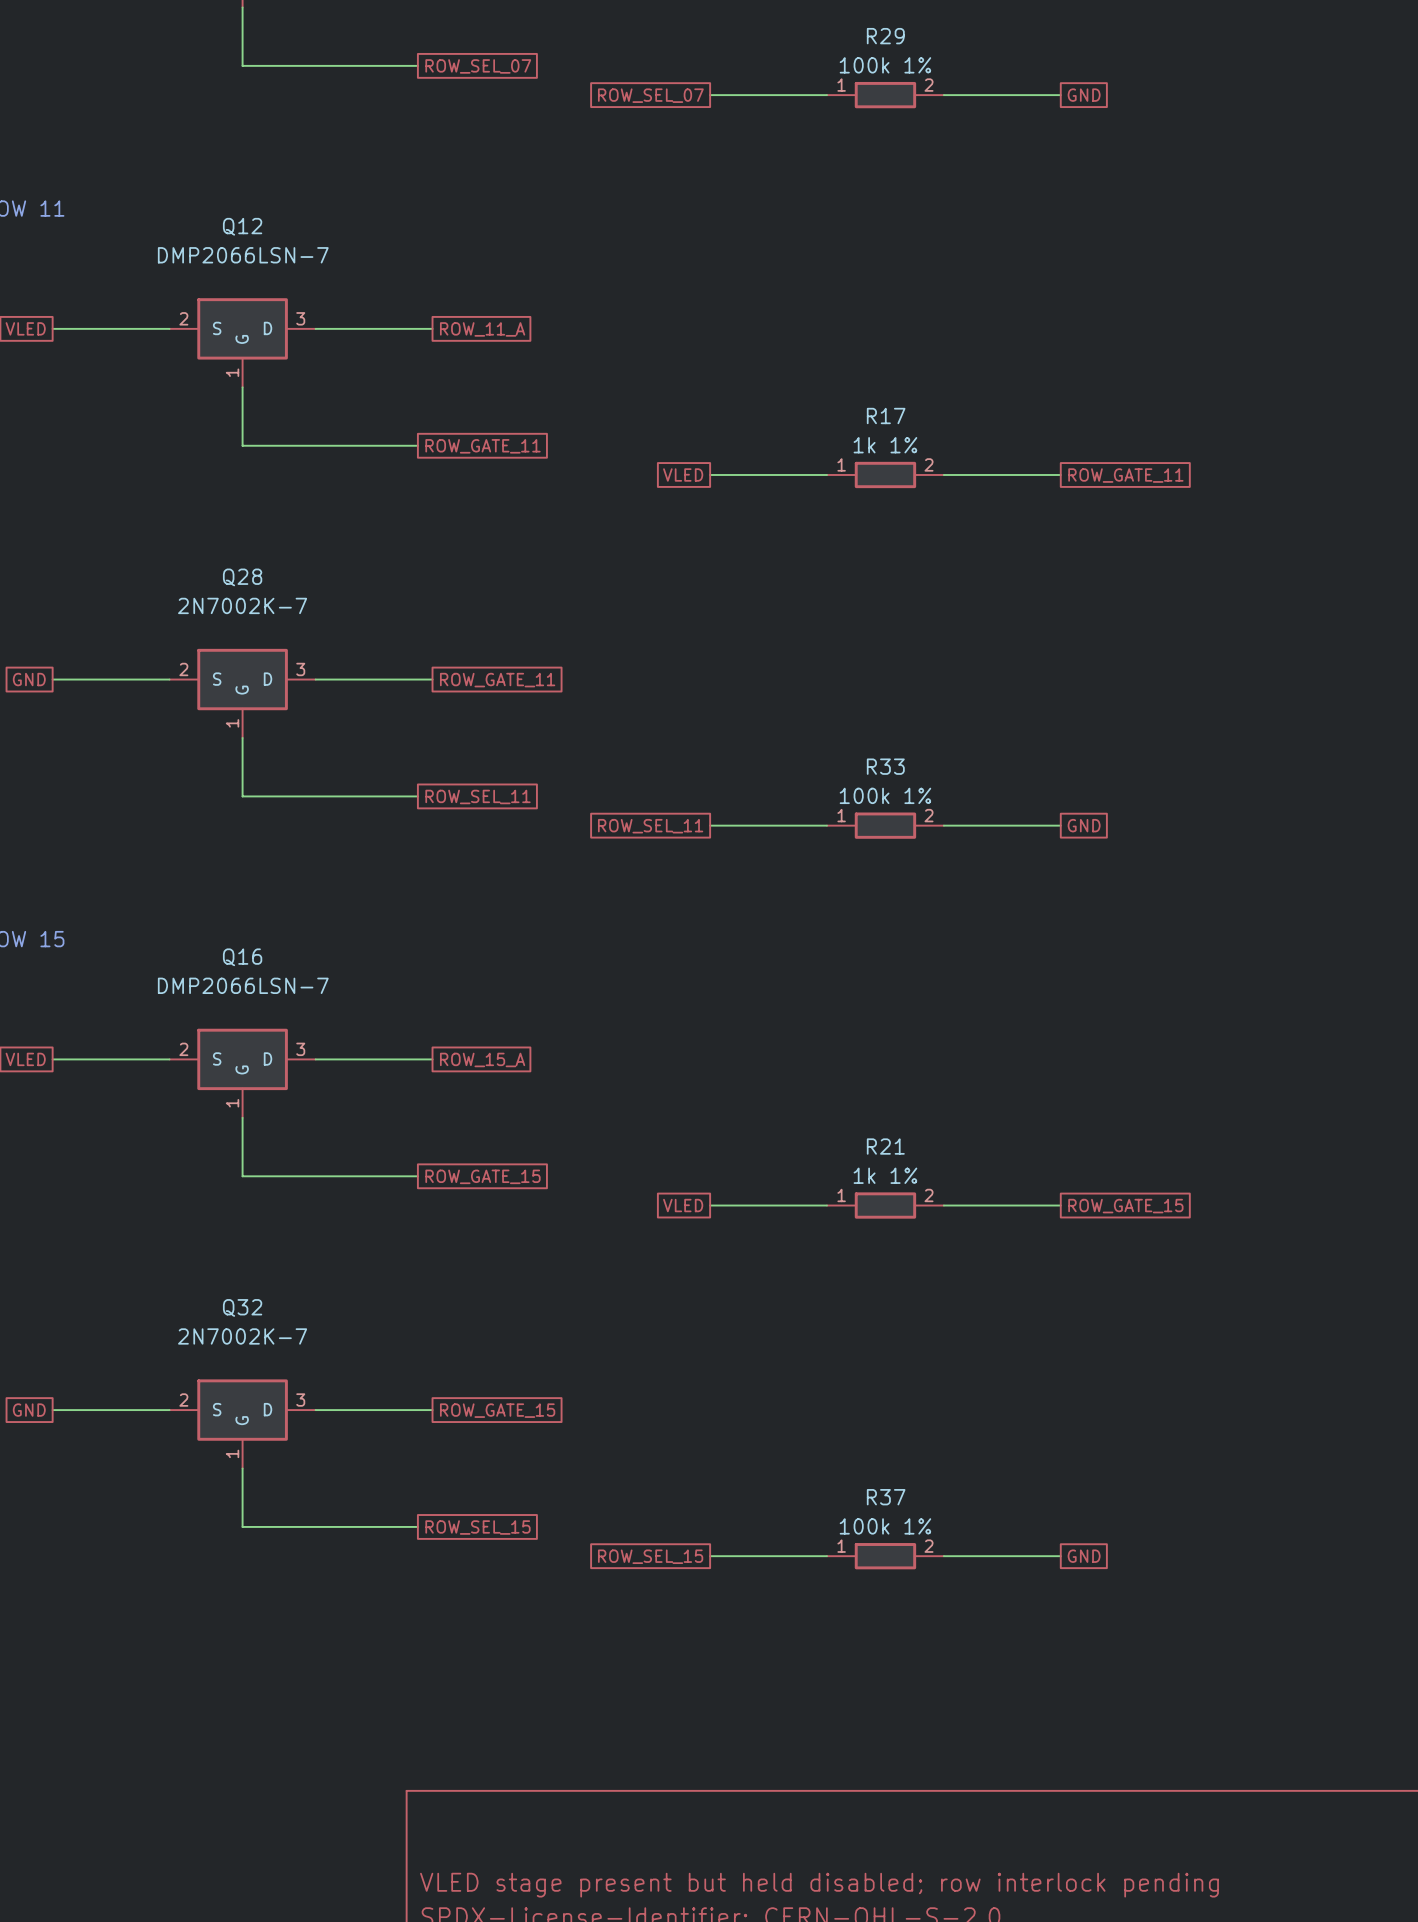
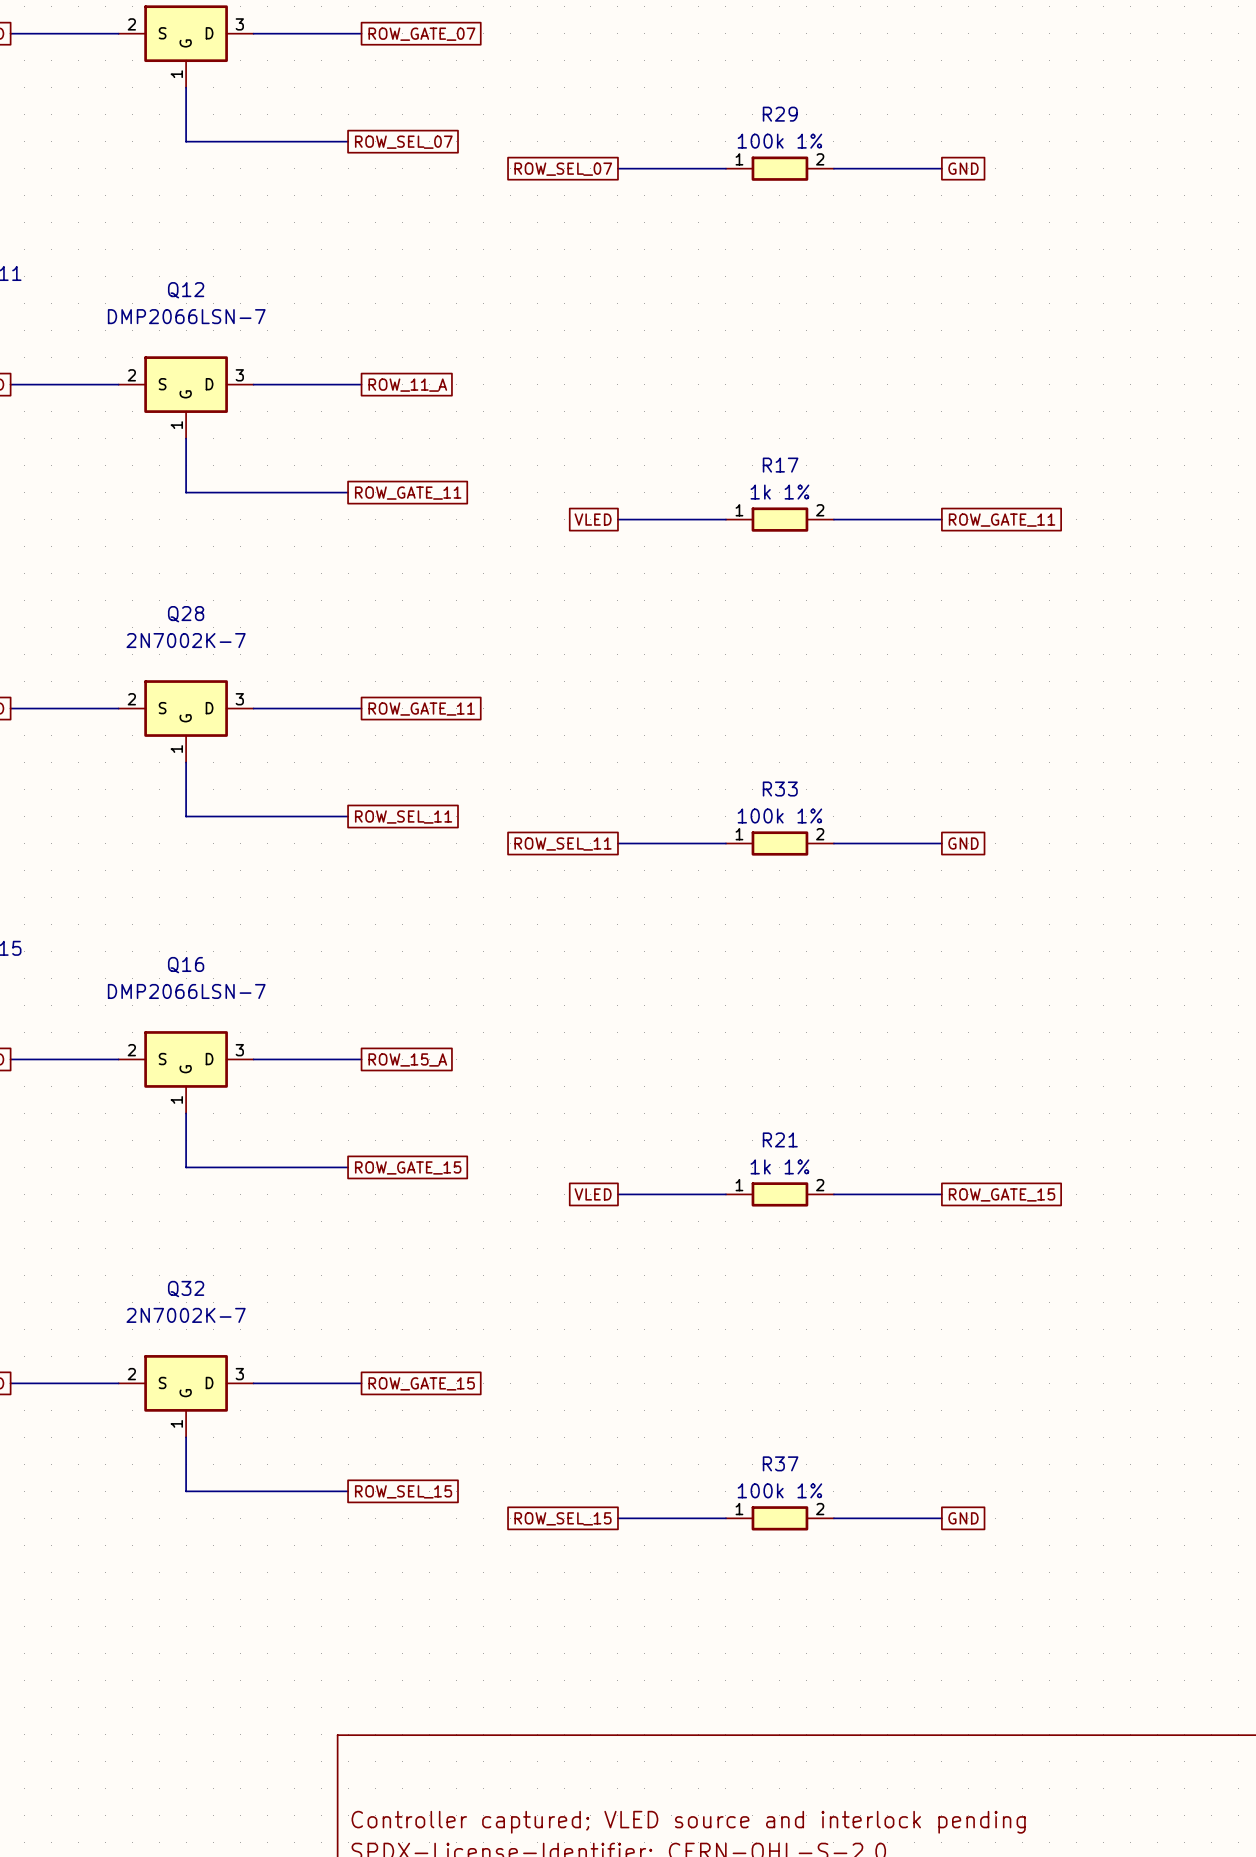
title block: VLED stage present but held disabled; row interlock pending (819, 1885) -> Controller captured; VLED source and interlock pending (688, 1822)

